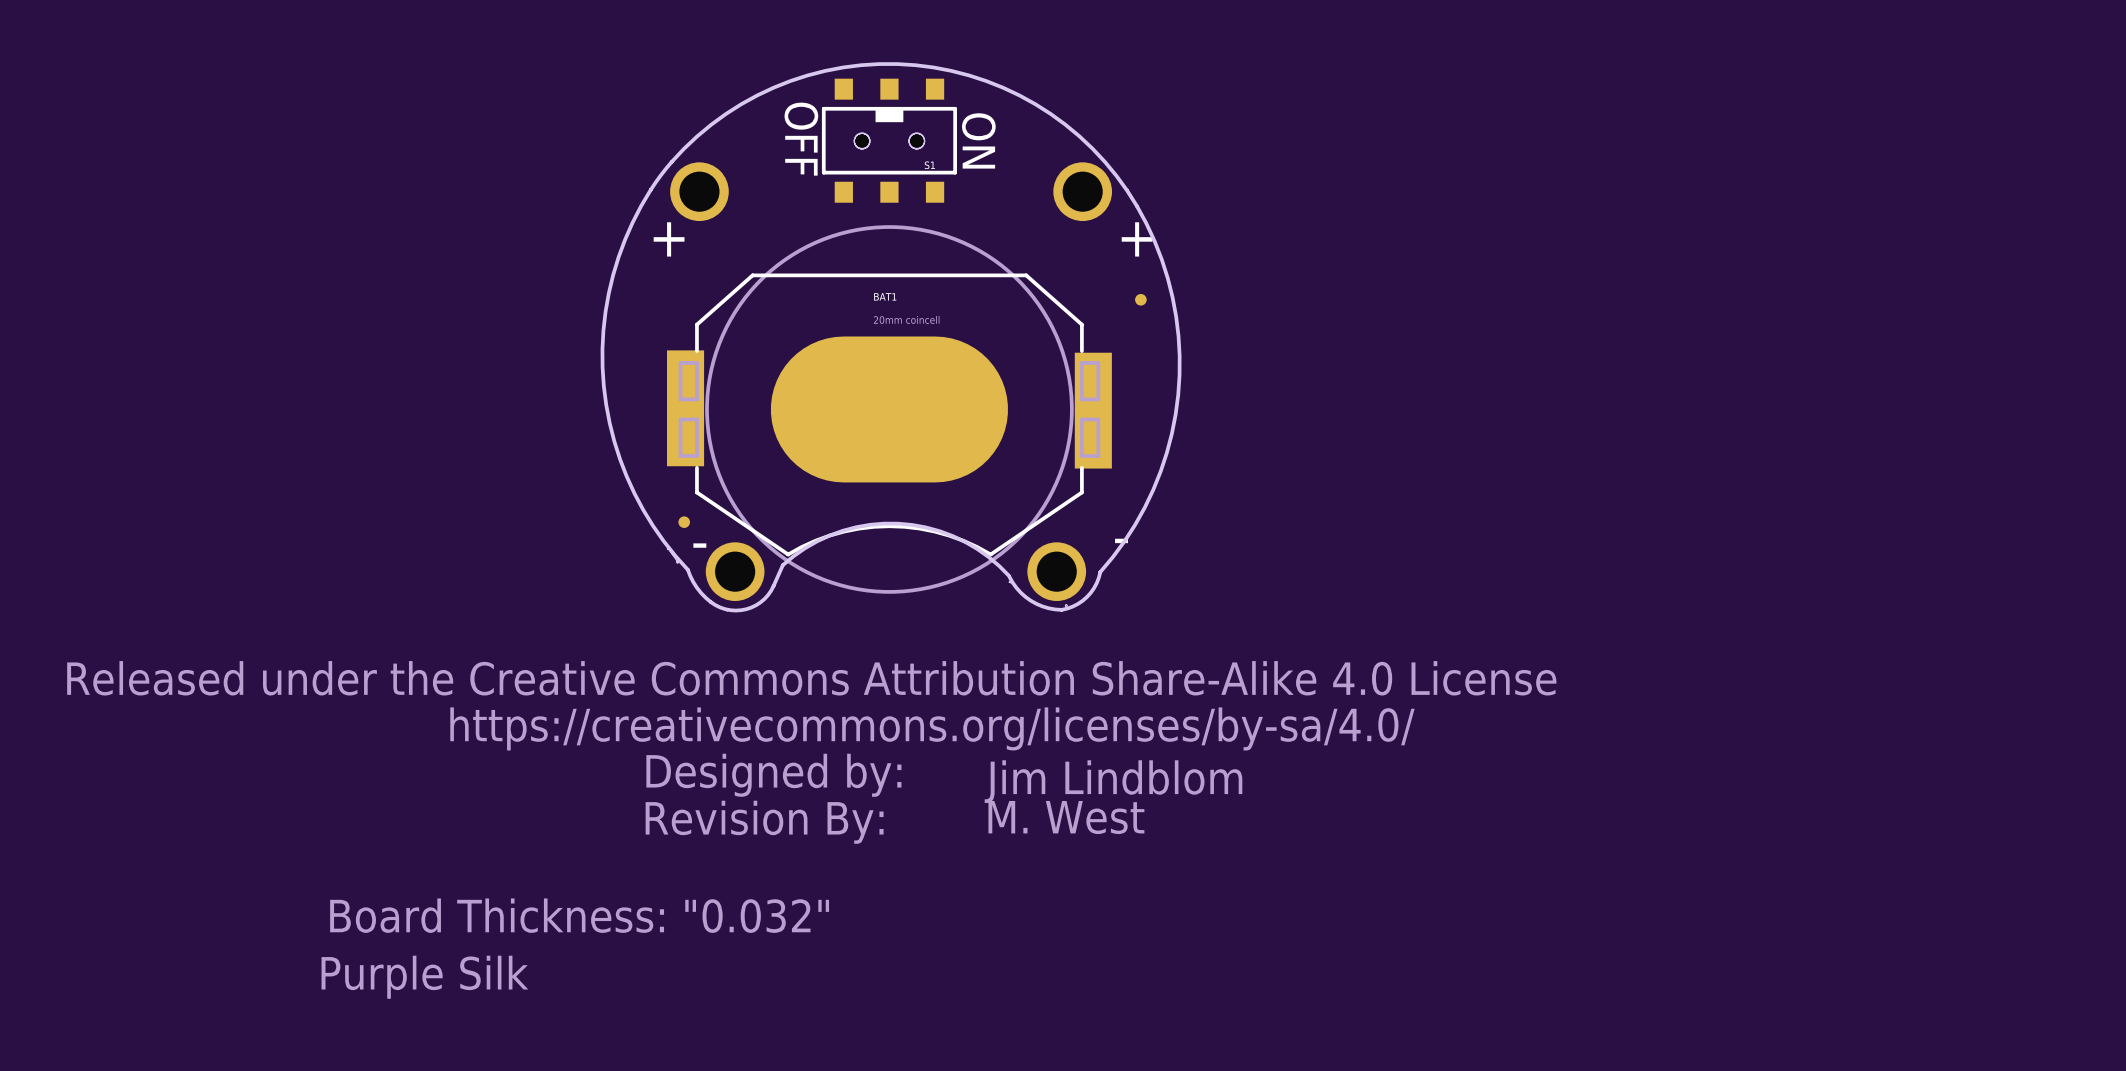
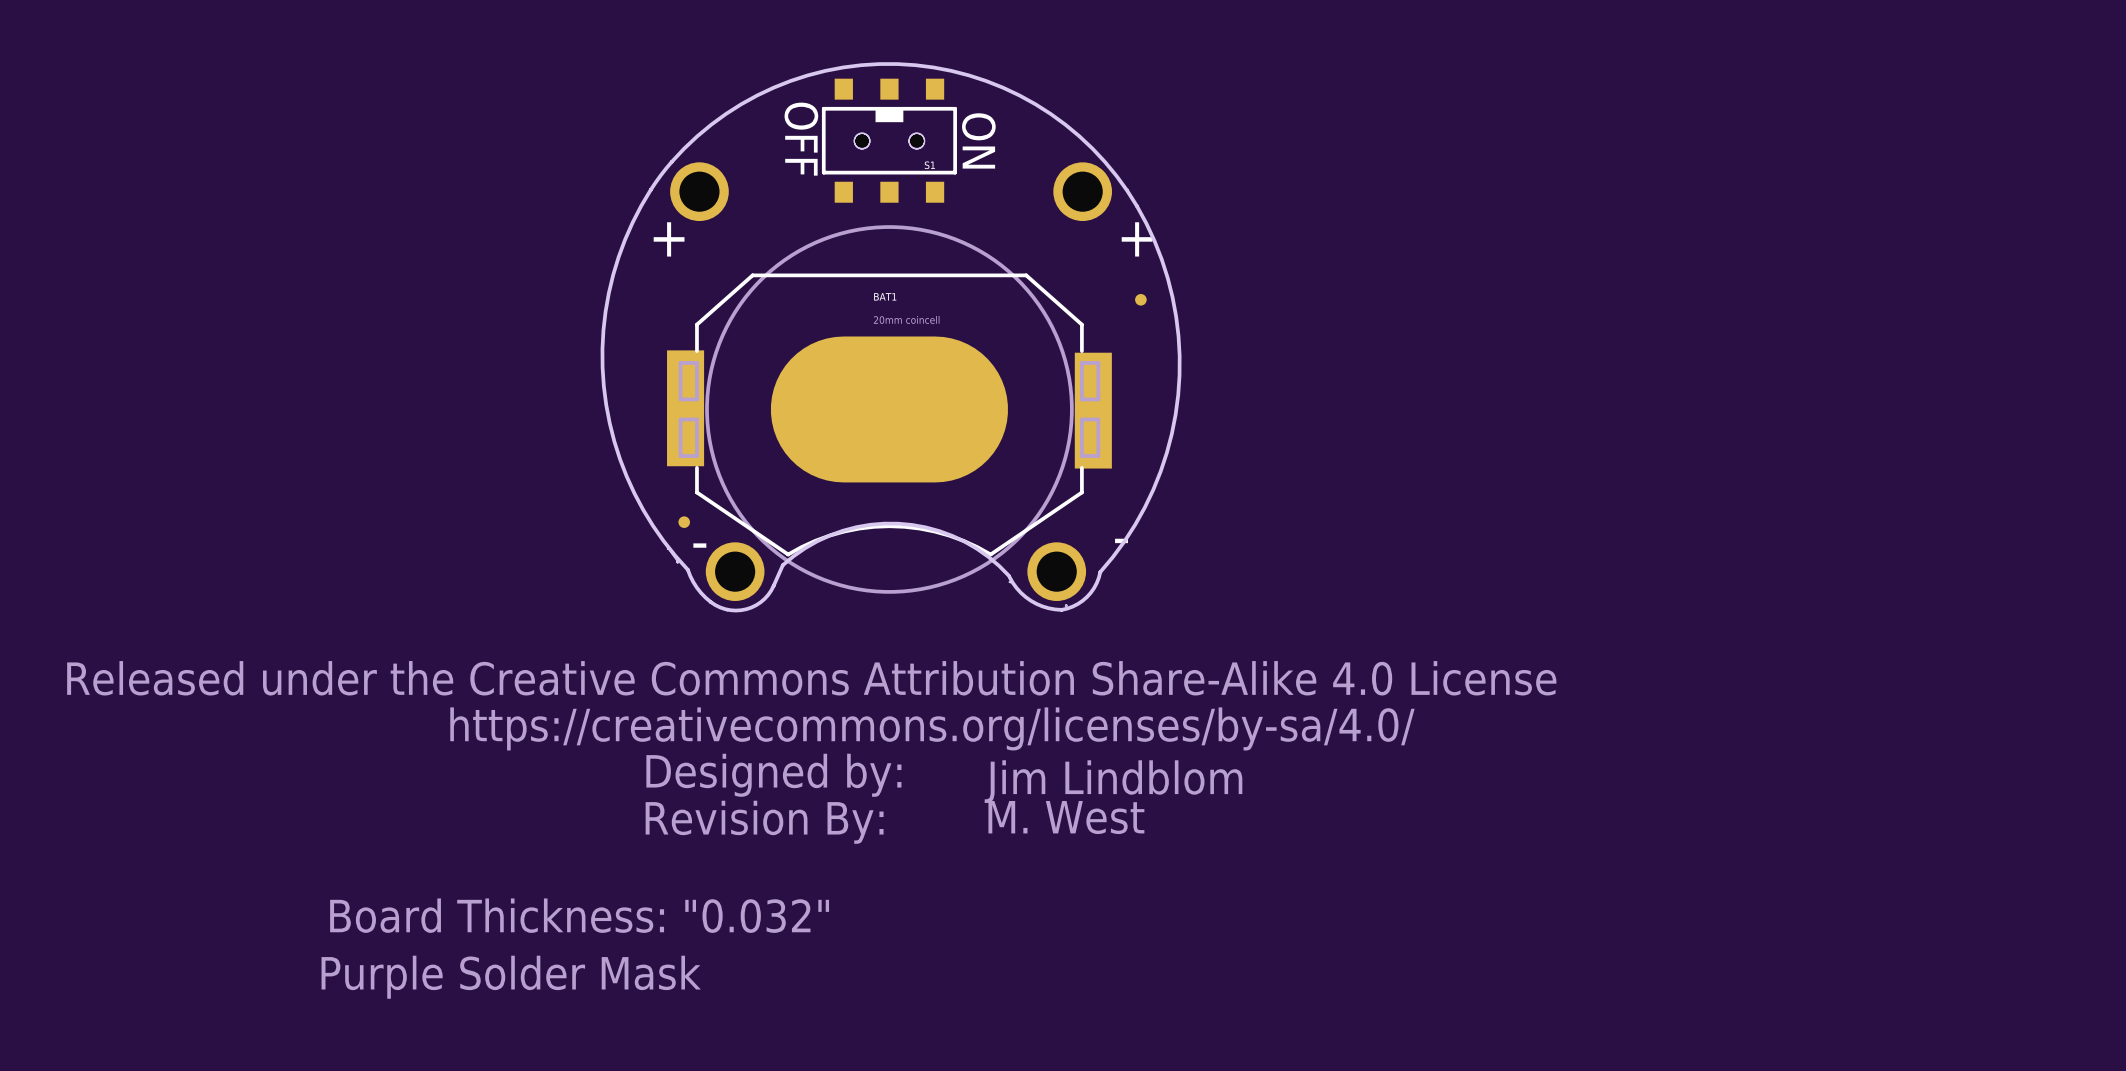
text: Purple Silk (424, 977) -> Purple Solder Mask (511, 977)

